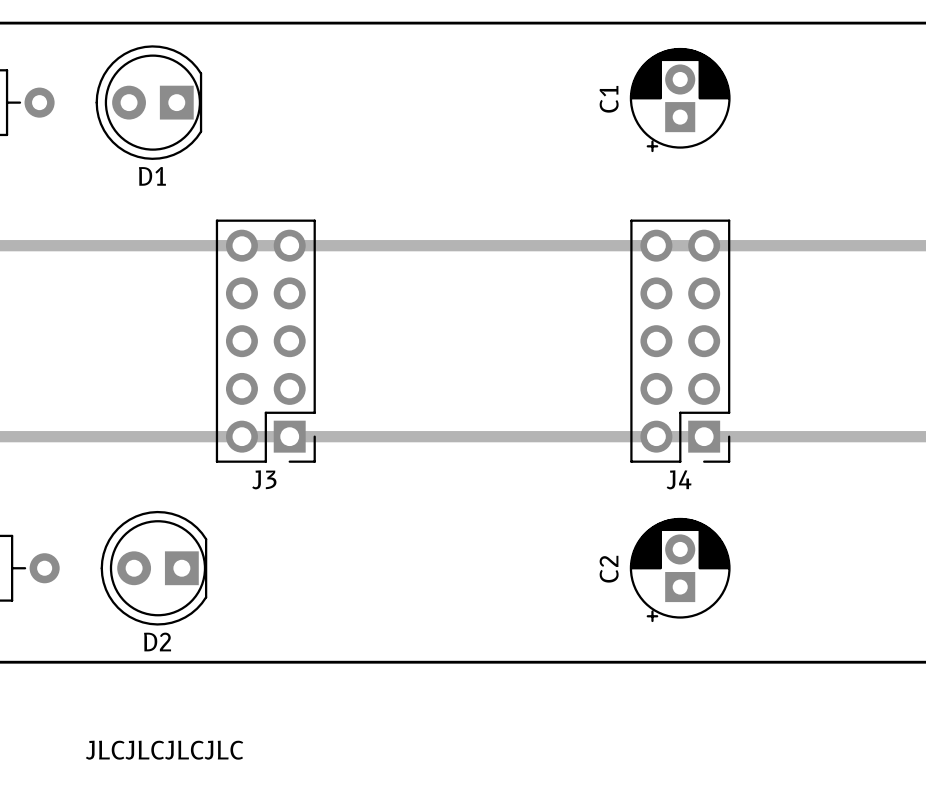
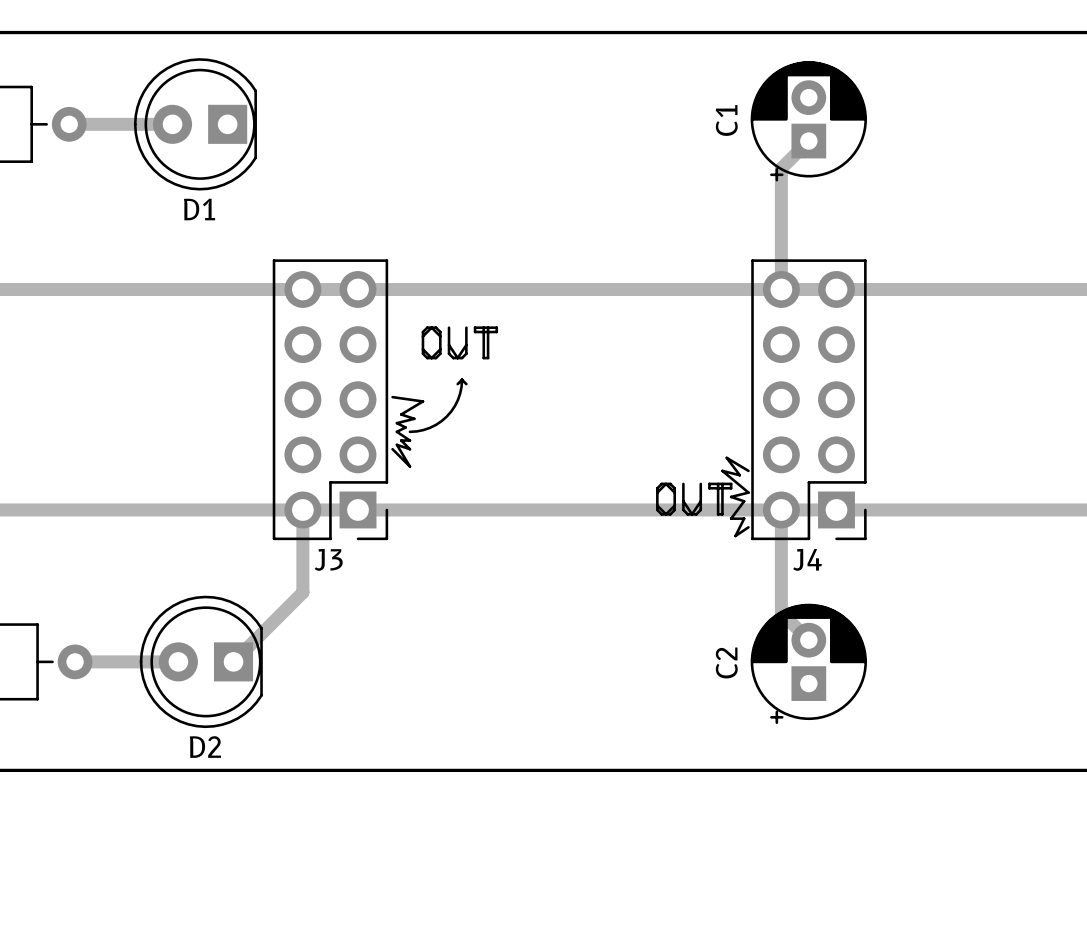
track: none -> (69, 124) (172, 124)
track: none -> (808, 141) (781, 168) (781, 289)
line: none -> (427, 327) (422, 332) (422, 353) (427, 358) (435, 358) (440, 353) (440, 332) (435, 327) (427, 327)
line: none -> (449, 327) (449, 353) (453, 358) (462, 358) (466, 353) (466, 327)
line: none -> (475, 327) (496, 327) (496, 332) (475, 332) (475, 327)
line: none -> (483, 327) (483, 358) (488, 358) (488, 327)
line: none -> (422, 336) (431, 327) (440, 336)
line: none -> (449, 345) (457, 358) (466, 345)
line: none -> (422, 349) (431, 358) (440, 349)
line: none -> (462, 379) (457, 384)
line: none -> (462, 379) (466, 384)
line: none -> (462, 379) (458, 399) (446, 416) (429, 427) (409, 431)
line: none -> (392, 397) (422, 401) (401, 414) (414, 418) (396, 423) (405, 427) (396, 431) (409, 440) (401, 440) (409, 449) (396, 444) (409, 466) (392, 449)
line: none -> (748, 470) (726, 457) (739, 475) (722, 470) (748, 492) (731, 496) (744, 501) (731, 518) (744, 518) (735, 536) (748, 527)
line: none -> (661, 483) (657, 488) (657, 509) (661, 514) (670, 514) (674, 509) (674, 488) (670, 483) (661, 483)
line: none -> (683, 483) (683, 509) (687, 514) (696, 514) (700, 509) (700, 483)
line: none -> (709, 483) (731, 483) (731, 488) (709, 488) (709, 483)
line: none -> (718, 483) (718, 514) (722, 514) (722, 483)
line: none -> (657, 492) (666, 483) (674, 492)
line: none -> (683, 501) (692, 514) (700, 501)
line: none -> (657, 505) (666, 514) (674, 505)
track: none -> (302, 509) (302, 592) (233, 661)
track: none -> (781, 509) (781, 612) (808, 640)
track: none -> (69, 661) (178, 661)
text: JLCJLCJLCJLC (164, 750) -> none

